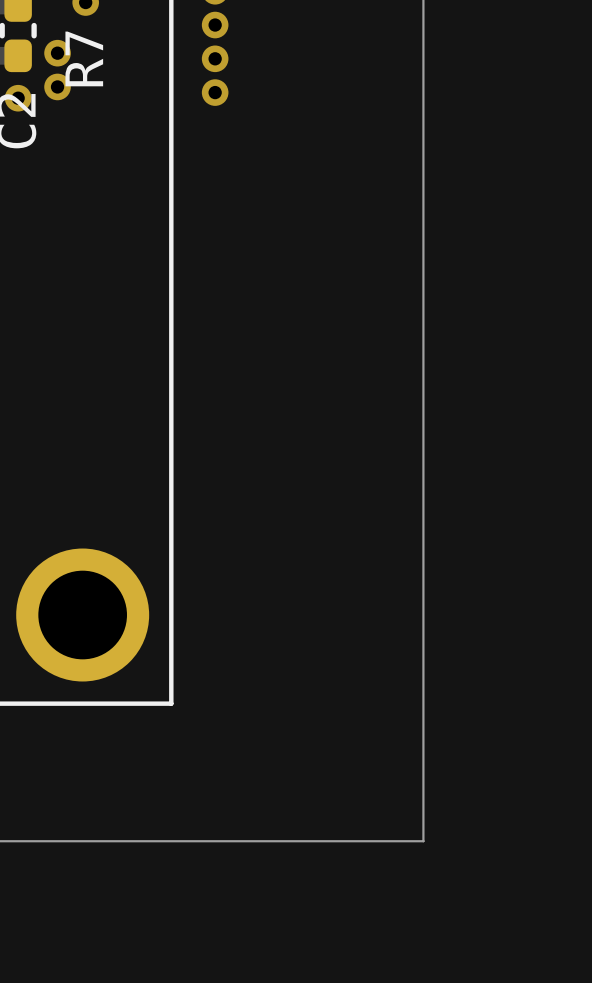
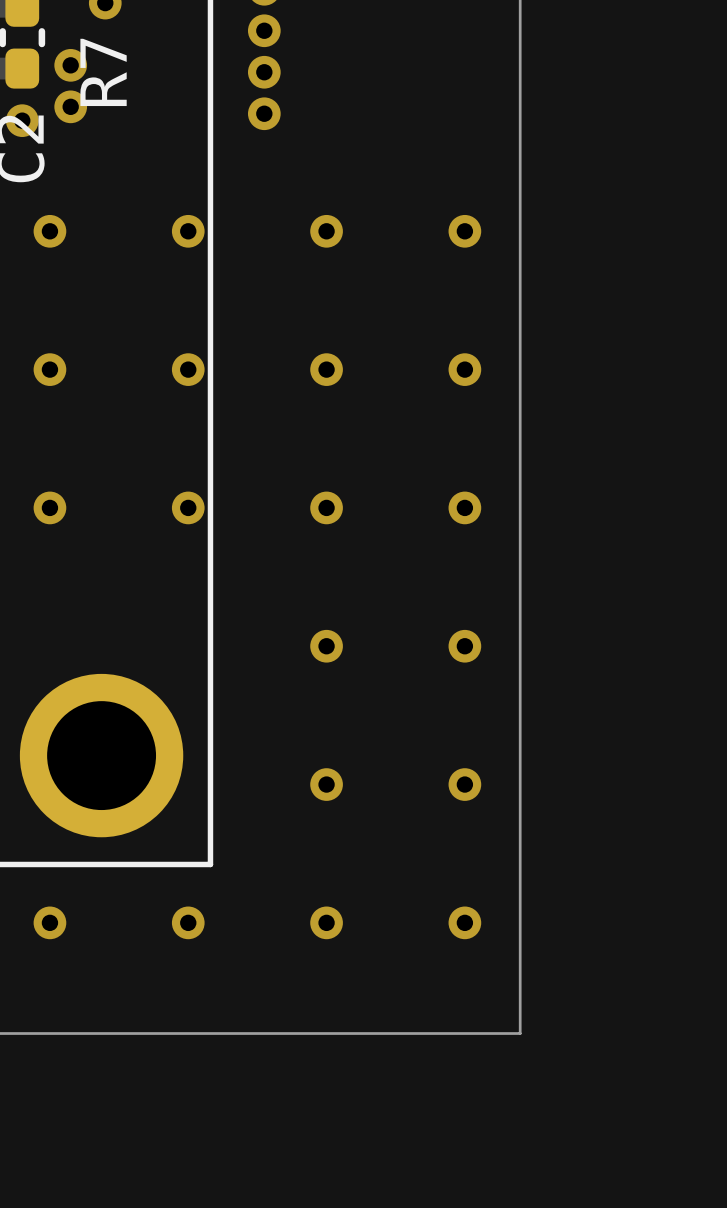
via: none -> (49, 231)
via: none -> (188, 231)
via: none -> (326, 231)
via: none -> (464, 231)
via: none -> (49, 369)
via: none -> (188, 369)
via: none -> (326, 369)
via: none -> (464, 369)
via: none -> (49, 507)
via: none -> (188, 507)
via: none -> (326, 507)
via: none -> (464, 507)
via: none -> (326, 646)
via: none -> (464, 646)
via: none -> (326, 784)
via: none -> (464, 784)
via: none -> (49, 922)
via: none -> (188, 922)
via: none -> (326, 922)
via: none -> (464, 922)

